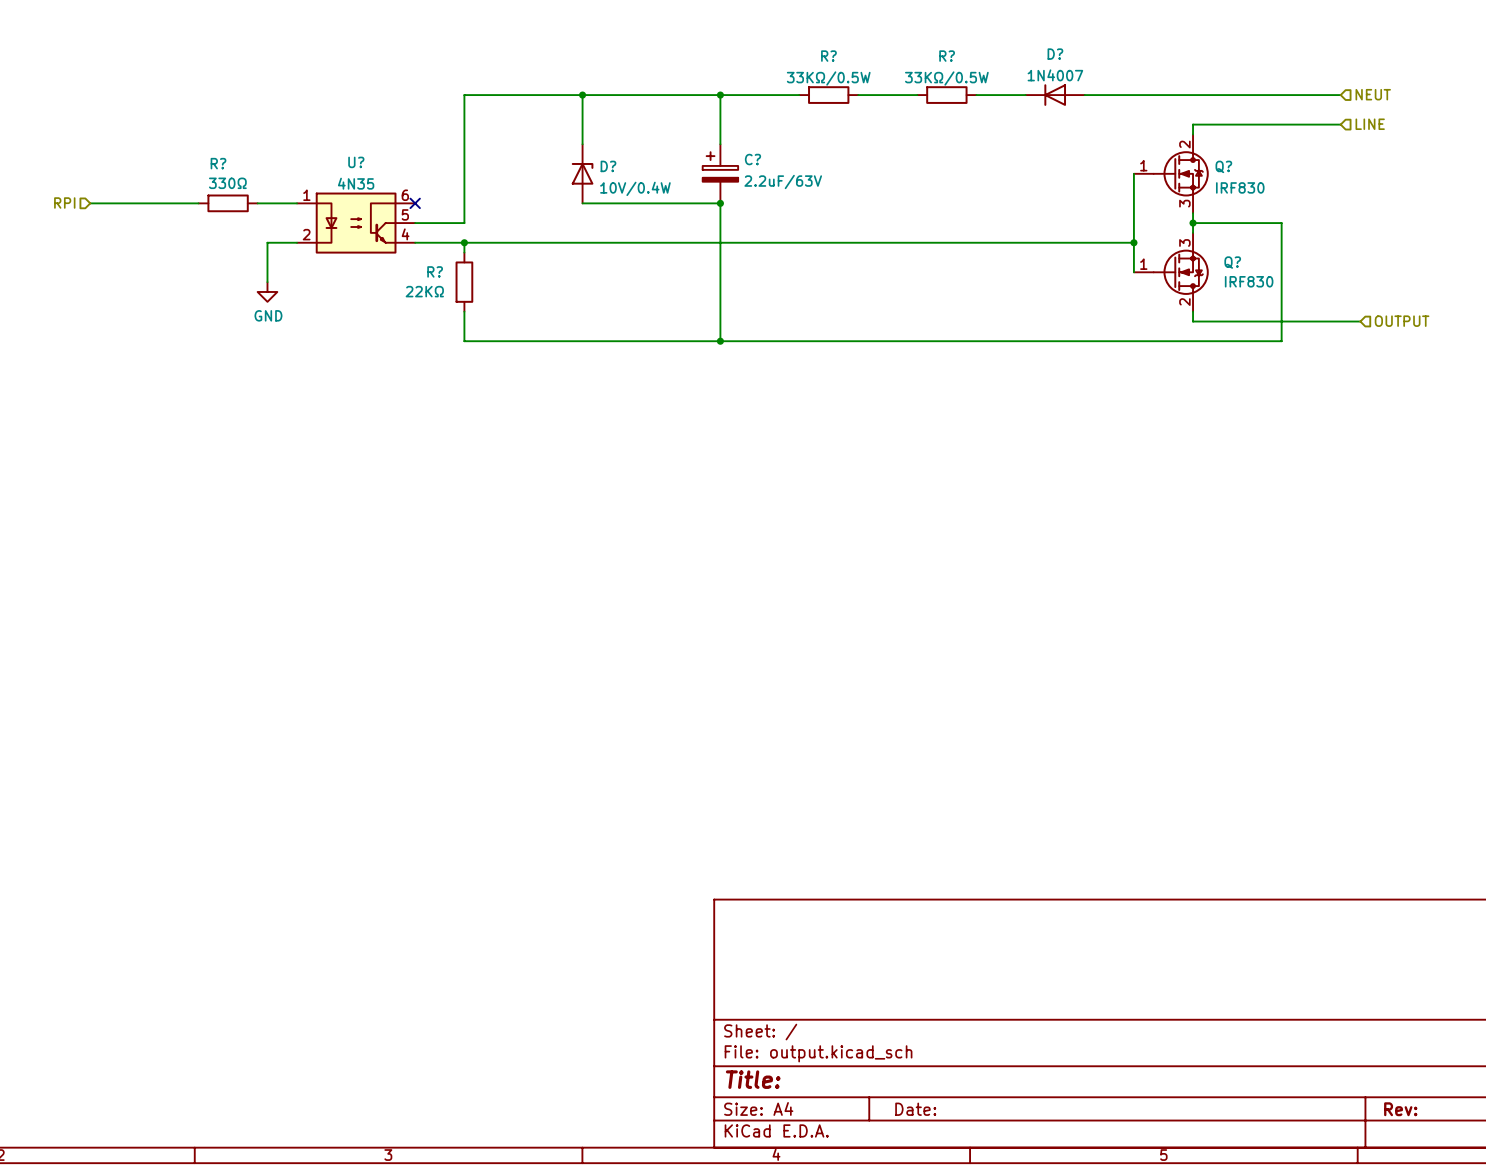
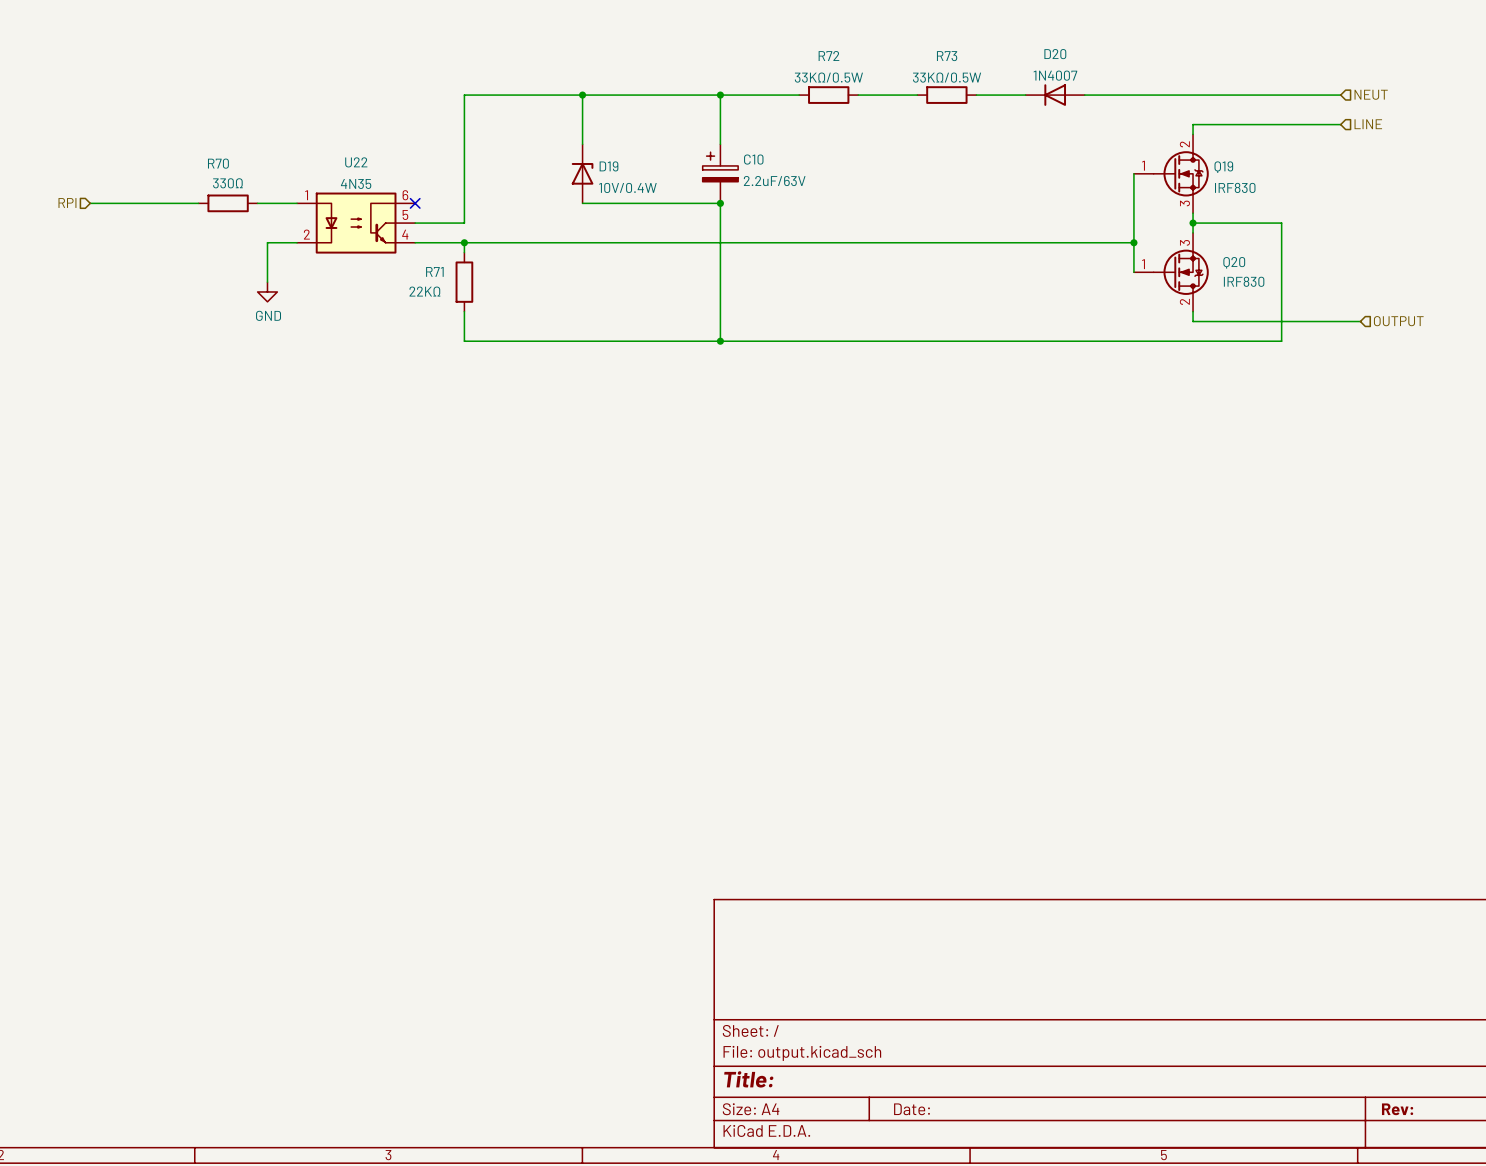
D? name: D? (1055, 54) -> D20 (1055, 54)
R? name: R? (828, 56) -> R72 (828, 56)
R? name: R? (947, 56) -> R73 (947, 56)
C? name: C? (752, 159) -> C10 (753, 159)
U? name: U? (356, 162) -> U22 (356, 162)
R? name: R? (218, 163) -> R70 (218, 163)
D? name: D? (608, 166) -> D19 (608, 166)
Q? name: Q? (1223, 166) -> Q19 (1223, 167)
Q? name: Q? (1232, 262) -> Q20 (1234, 262)
R? name: R? (435, 271) -> R71 (434, 271)

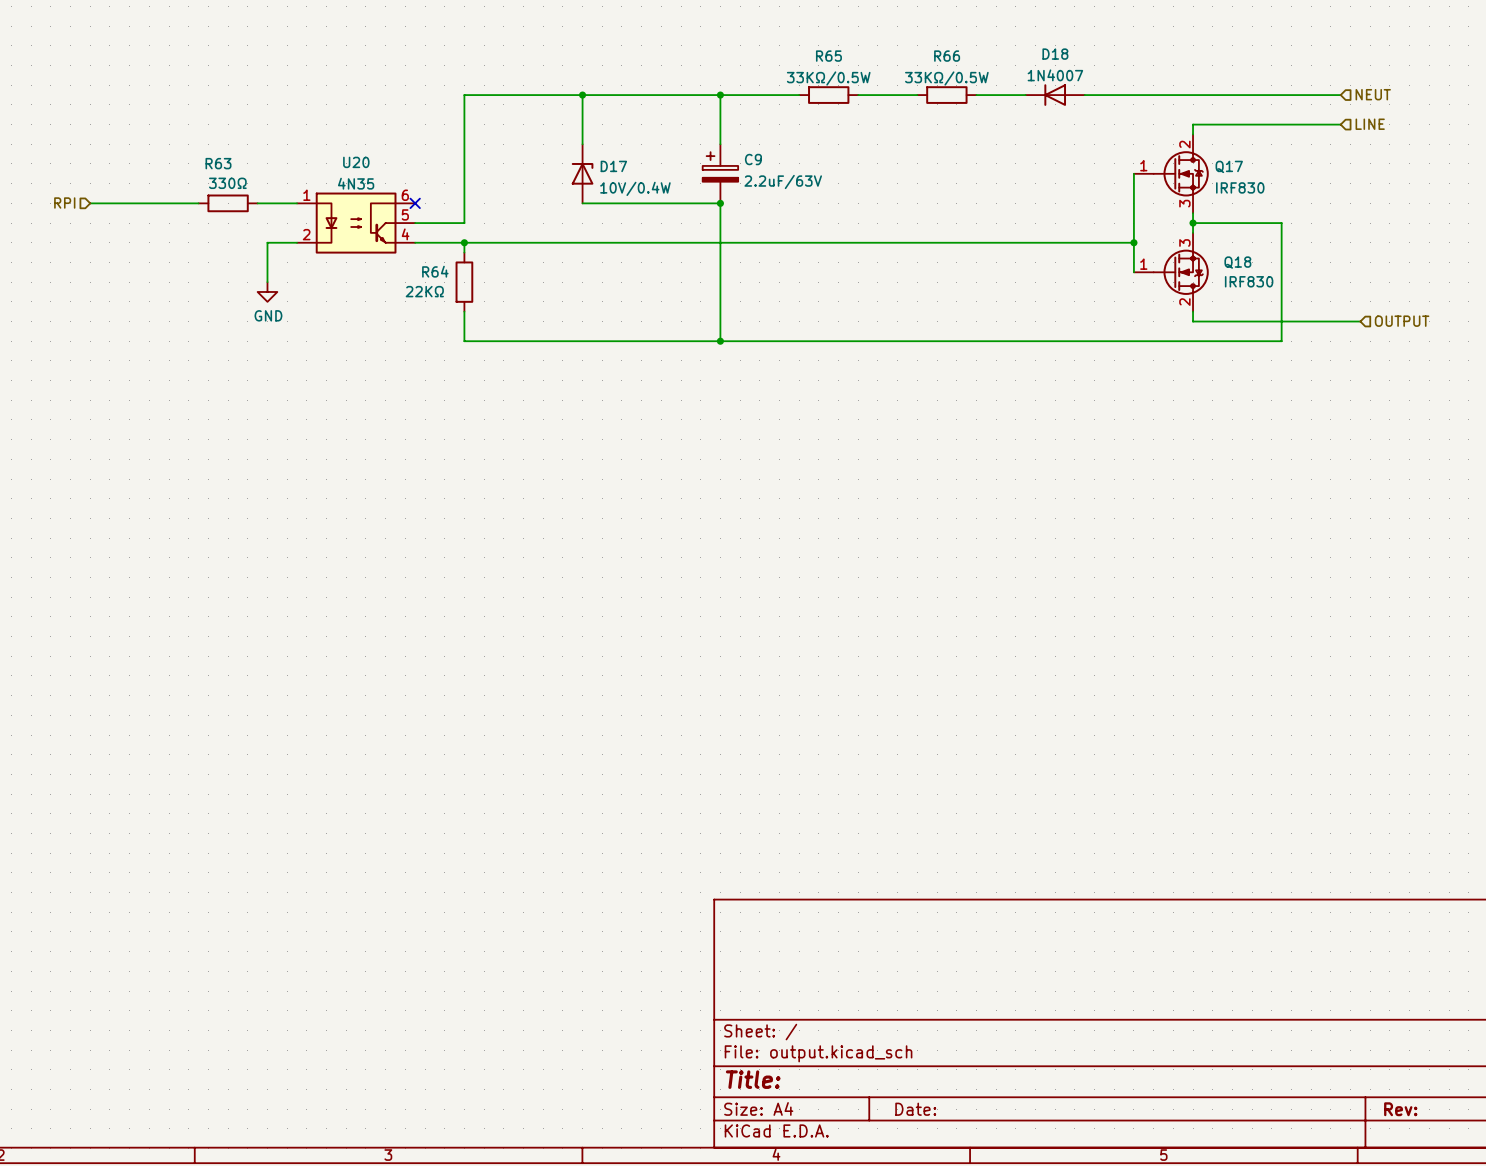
D20 name: D20 (1055, 54) -> D18 (1055, 54)
R72 name: R72 (828, 56) -> R65 (828, 56)
R73 name: R73 (947, 56) -> R66 (947, 56)
C10 name: C10 (753, 159) -> C9 (753, 159)
U22 name: U22 (356, 162) -> U20 (356, 162)
R70 name: R70 (218, 163) -> R63 (218, 163)
D19 name: D19 (608, 166) -> D17 (613, 166)
Q19 name: Q19 (1223, 167) -> Q17 (1229, 166)
Q20 name: Q20 (1234, 262) -> Q18 (1237, 262)
R71 name: R71 (434, 271) -> R64 (435, 271)

